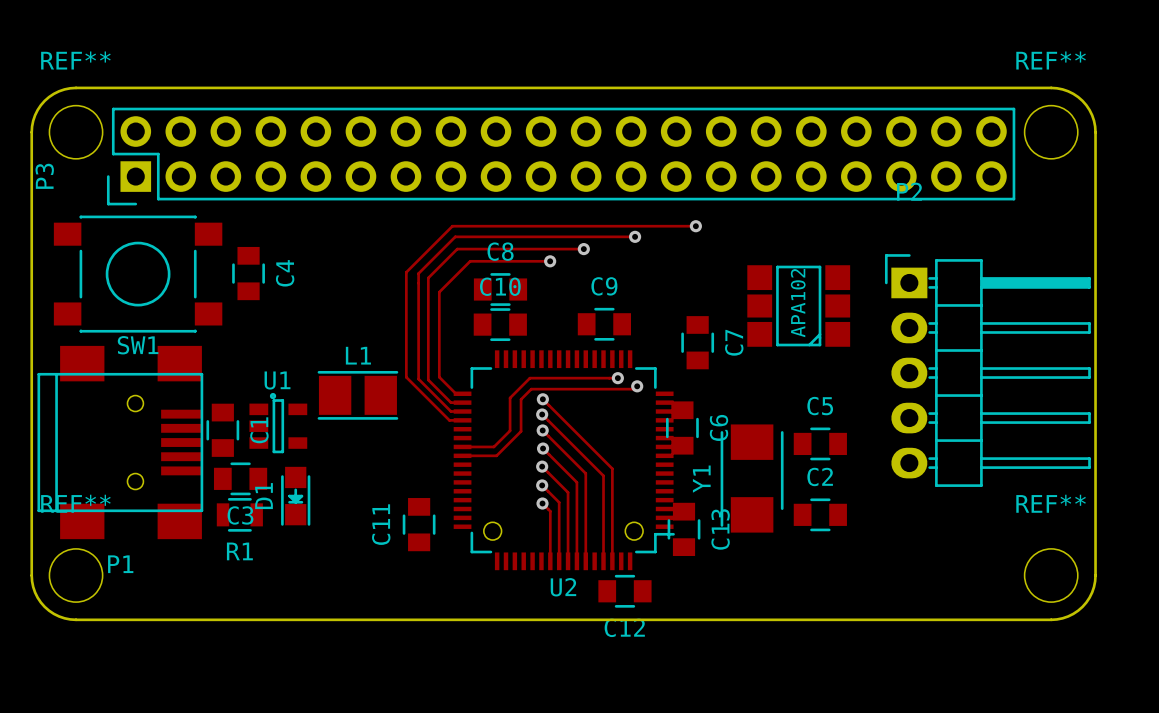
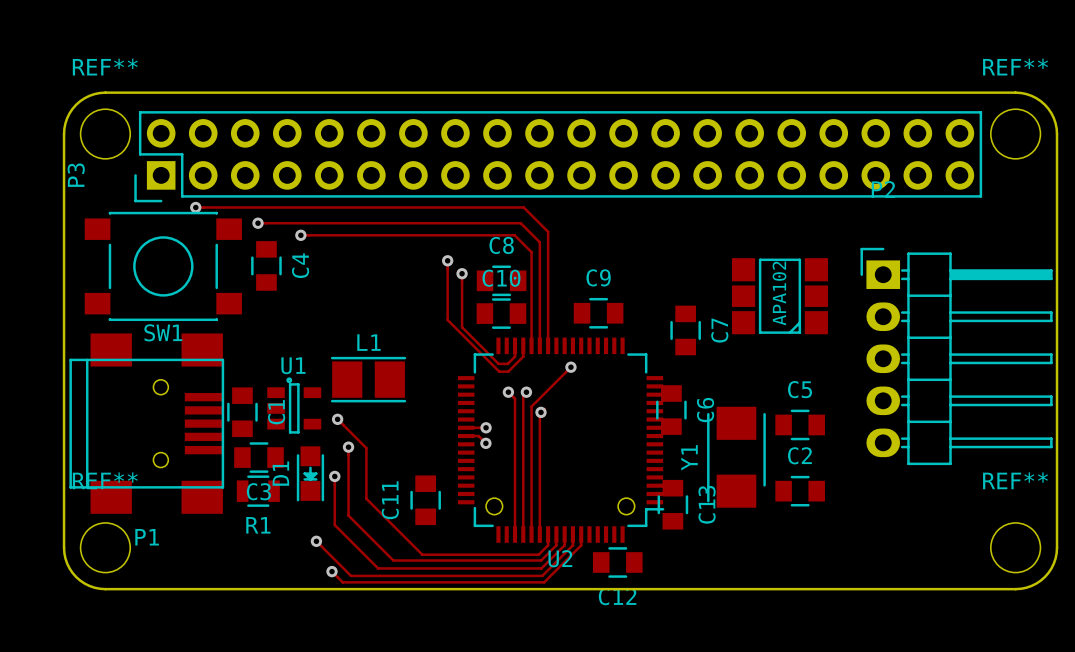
track: none -> (195, 207) (523, 207) (548, 231) (548, 345)
via: none -> (195, 207)
track: (695, 226) (452, 226) (406, 272) (406, 377) (449, 420) (462, 420) -> none
via: (695, 226) -> none
track: none -> (258, 223) (520, 223) (539, 242) (539, 345)
via: none -> (258, 223)
track: (635, 236) (455, 236) (418, 273) (418, 379) (450, 411) (462, 411) -> none
via: (635, 236) -> none
track: none -> (300, 235) (514, 235) (531, 252) (531, 345)
via: none -> (300, 235)
track: (583, 249) (457, 249) (428, 277) (428, 379) (450, 402) (462, 402) -> none
via: (583, 249) -> none
track: (550, 261) (470, 261) (439, 292) (439, 377) (455, 393) (462, 393) -> none
via: (550, 261) -> none
track: none -> (447, 260) (447, 320) (499, 371) (508, 371) (523, 356) (523, 345)
via: none -> (447, 260)
track: none -> (462, 273) (462, 327) (498, 363) (507, 363) (515, 356) (515, 345)
via: none -> (462, 273)
track: (617, 378) (529, 378) (510, 398) (510, 430) (493, 446) (483, 446) -> none
via: (617, 378) -> none
track: none -> (570, 367) (531, 406) (531, 534)
via: none -> (570, 367)
track: (637, 386) (634, 389) (531, 389) (521, 399) (521, 431) (496, 455) (475, 455) -> (485, 443) (478, 436)
via: (637, 386) -> none
track: (542, 399) (612, 468) (612, 561) -> none
via: (542, 399) -> none
track: none -> (508, 392) (515, 398) (515, 534)
via: none -> (508, 392)
track: none -> (526, 392) (523, 395) (523, 534)
via: none -> (526, 392)
track: (542, 414) (603, 475) (603, 561) -> none
via: (542, 414) -> none
track: none -> (544, 408) (539, 413) (539, 534)
track: (542, 430) (585, 473) (585, 561) -> (331, 571) (342, 582) (544, 582) (581, 545) (581, 534)
via: none -> (337, 419)
via: none -> (486, 427)
track: (543, 448) (576, 482) (576, 561) -> (316, 541) (351, 575) (542, 575) (572, 545) (572, 534)
via: (543, 448) -> none
via: none -> (485, 443)
track: (542, 466) (568, 492) (568, 561) -> (334, 476) (334, 525) (378, 568) (541, 568) (564, 545) (564, 534)
via: (542, 466) -> none
via: none -> (348, 447)
track: (542, 485) (559, 502) (559, 561) -> (348, 447) (348, 515) (393, 560) (541, 560) (556, 545) (556, 534)
via: (542, 485) -> none
via: none -> (334, 476)
track: (542, 503) (550, 511) (550, 561) -> (337, 419) (366, 448) (366, 498) (422, 554) (538, 554) (548, 545) (548, 534)
via: (542, 503) -> none
via: none -> (316, 541)
via: none -> (331, 571)

